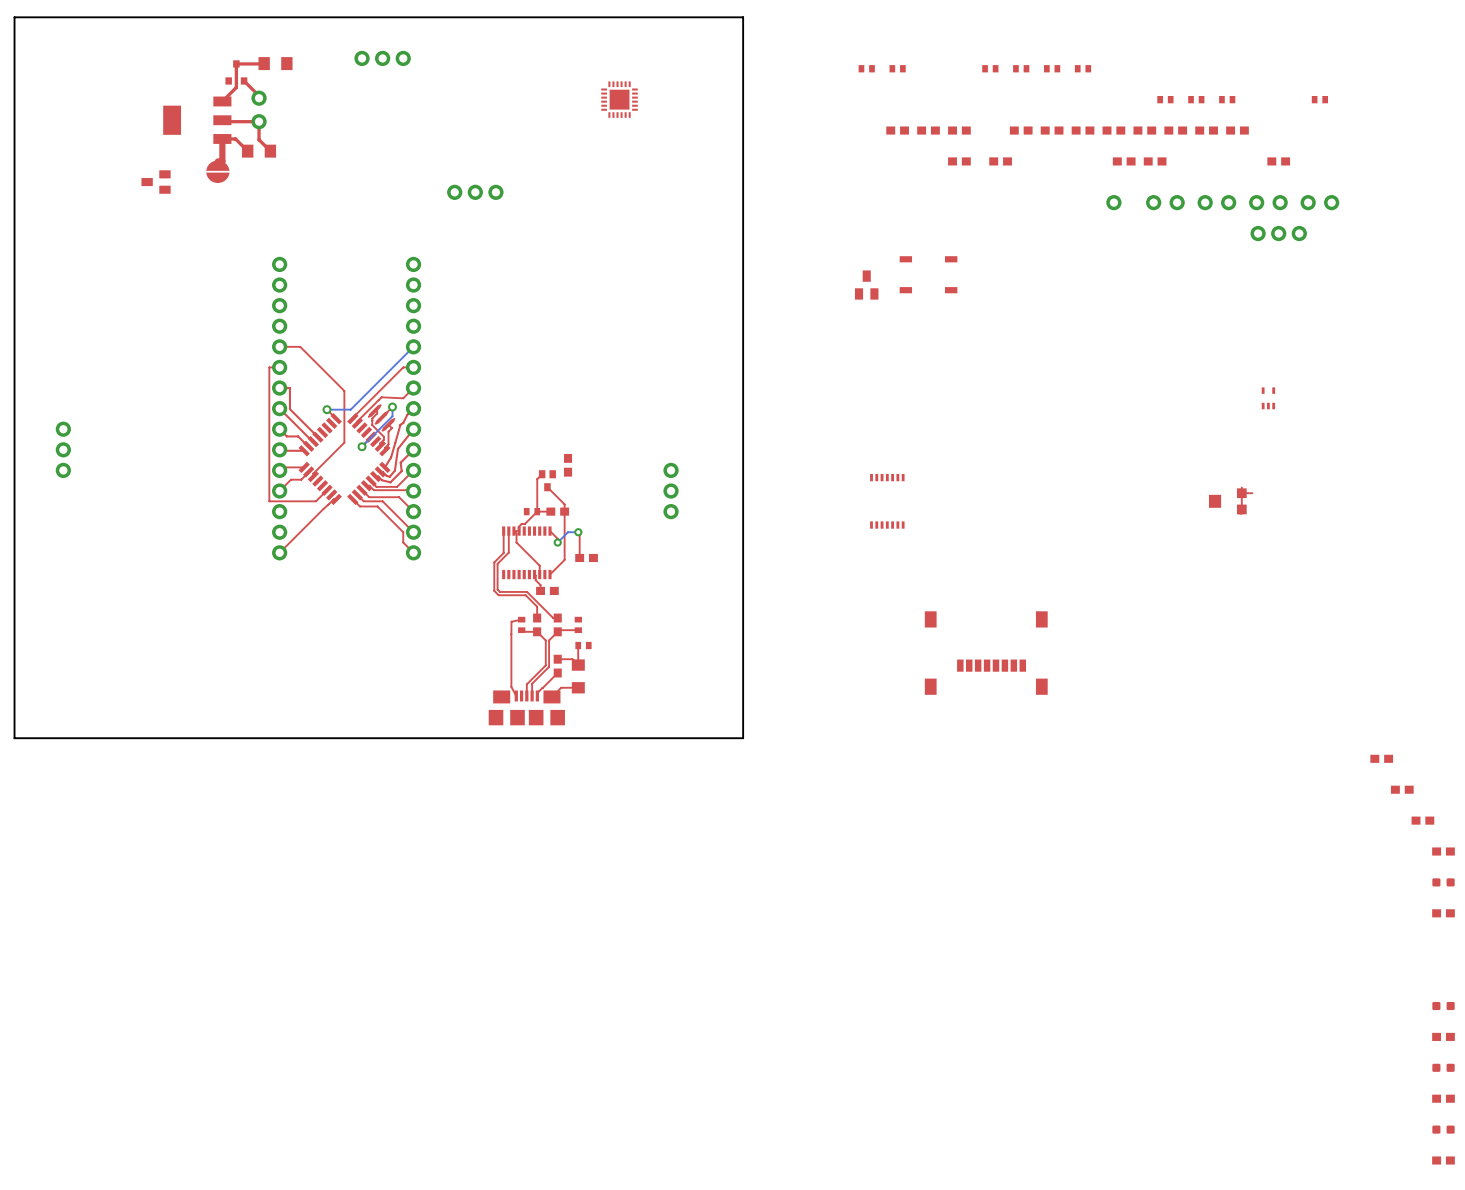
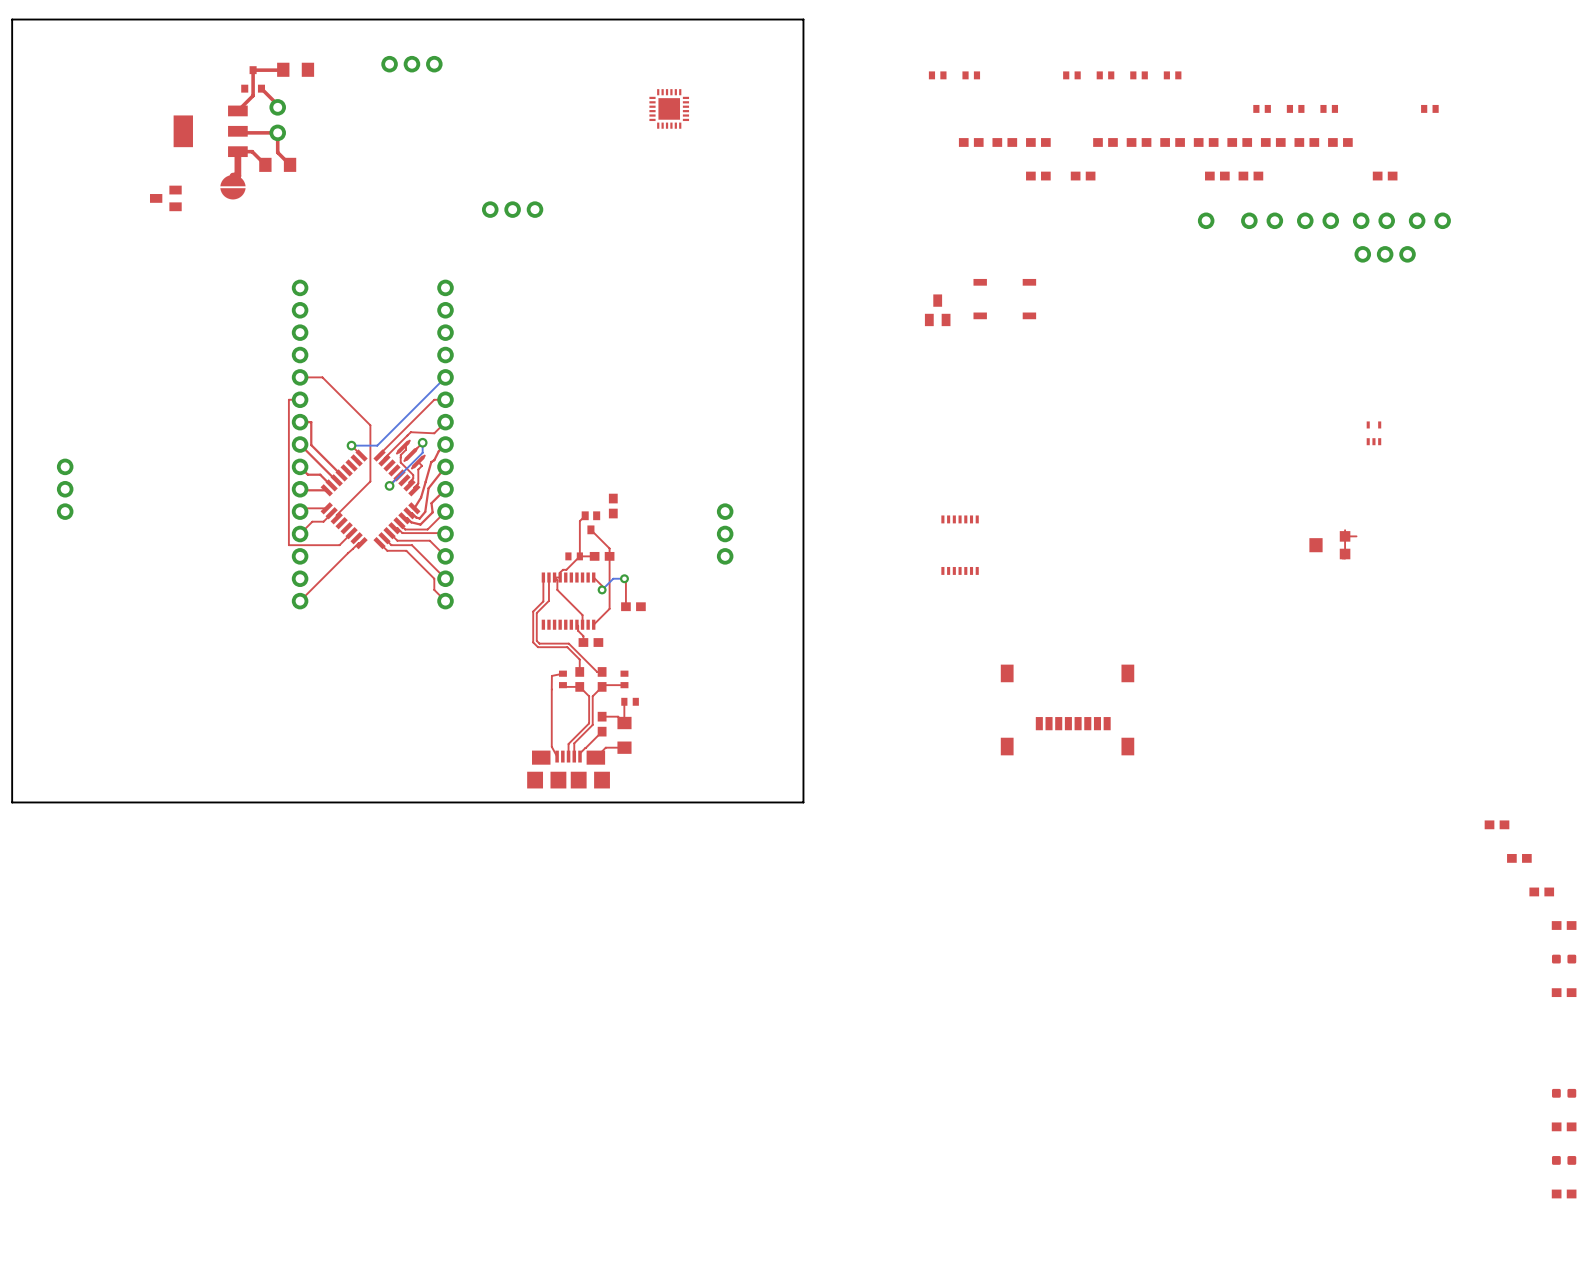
part: (1443, 1129) -> none
part: (1443, 1160) -> none

